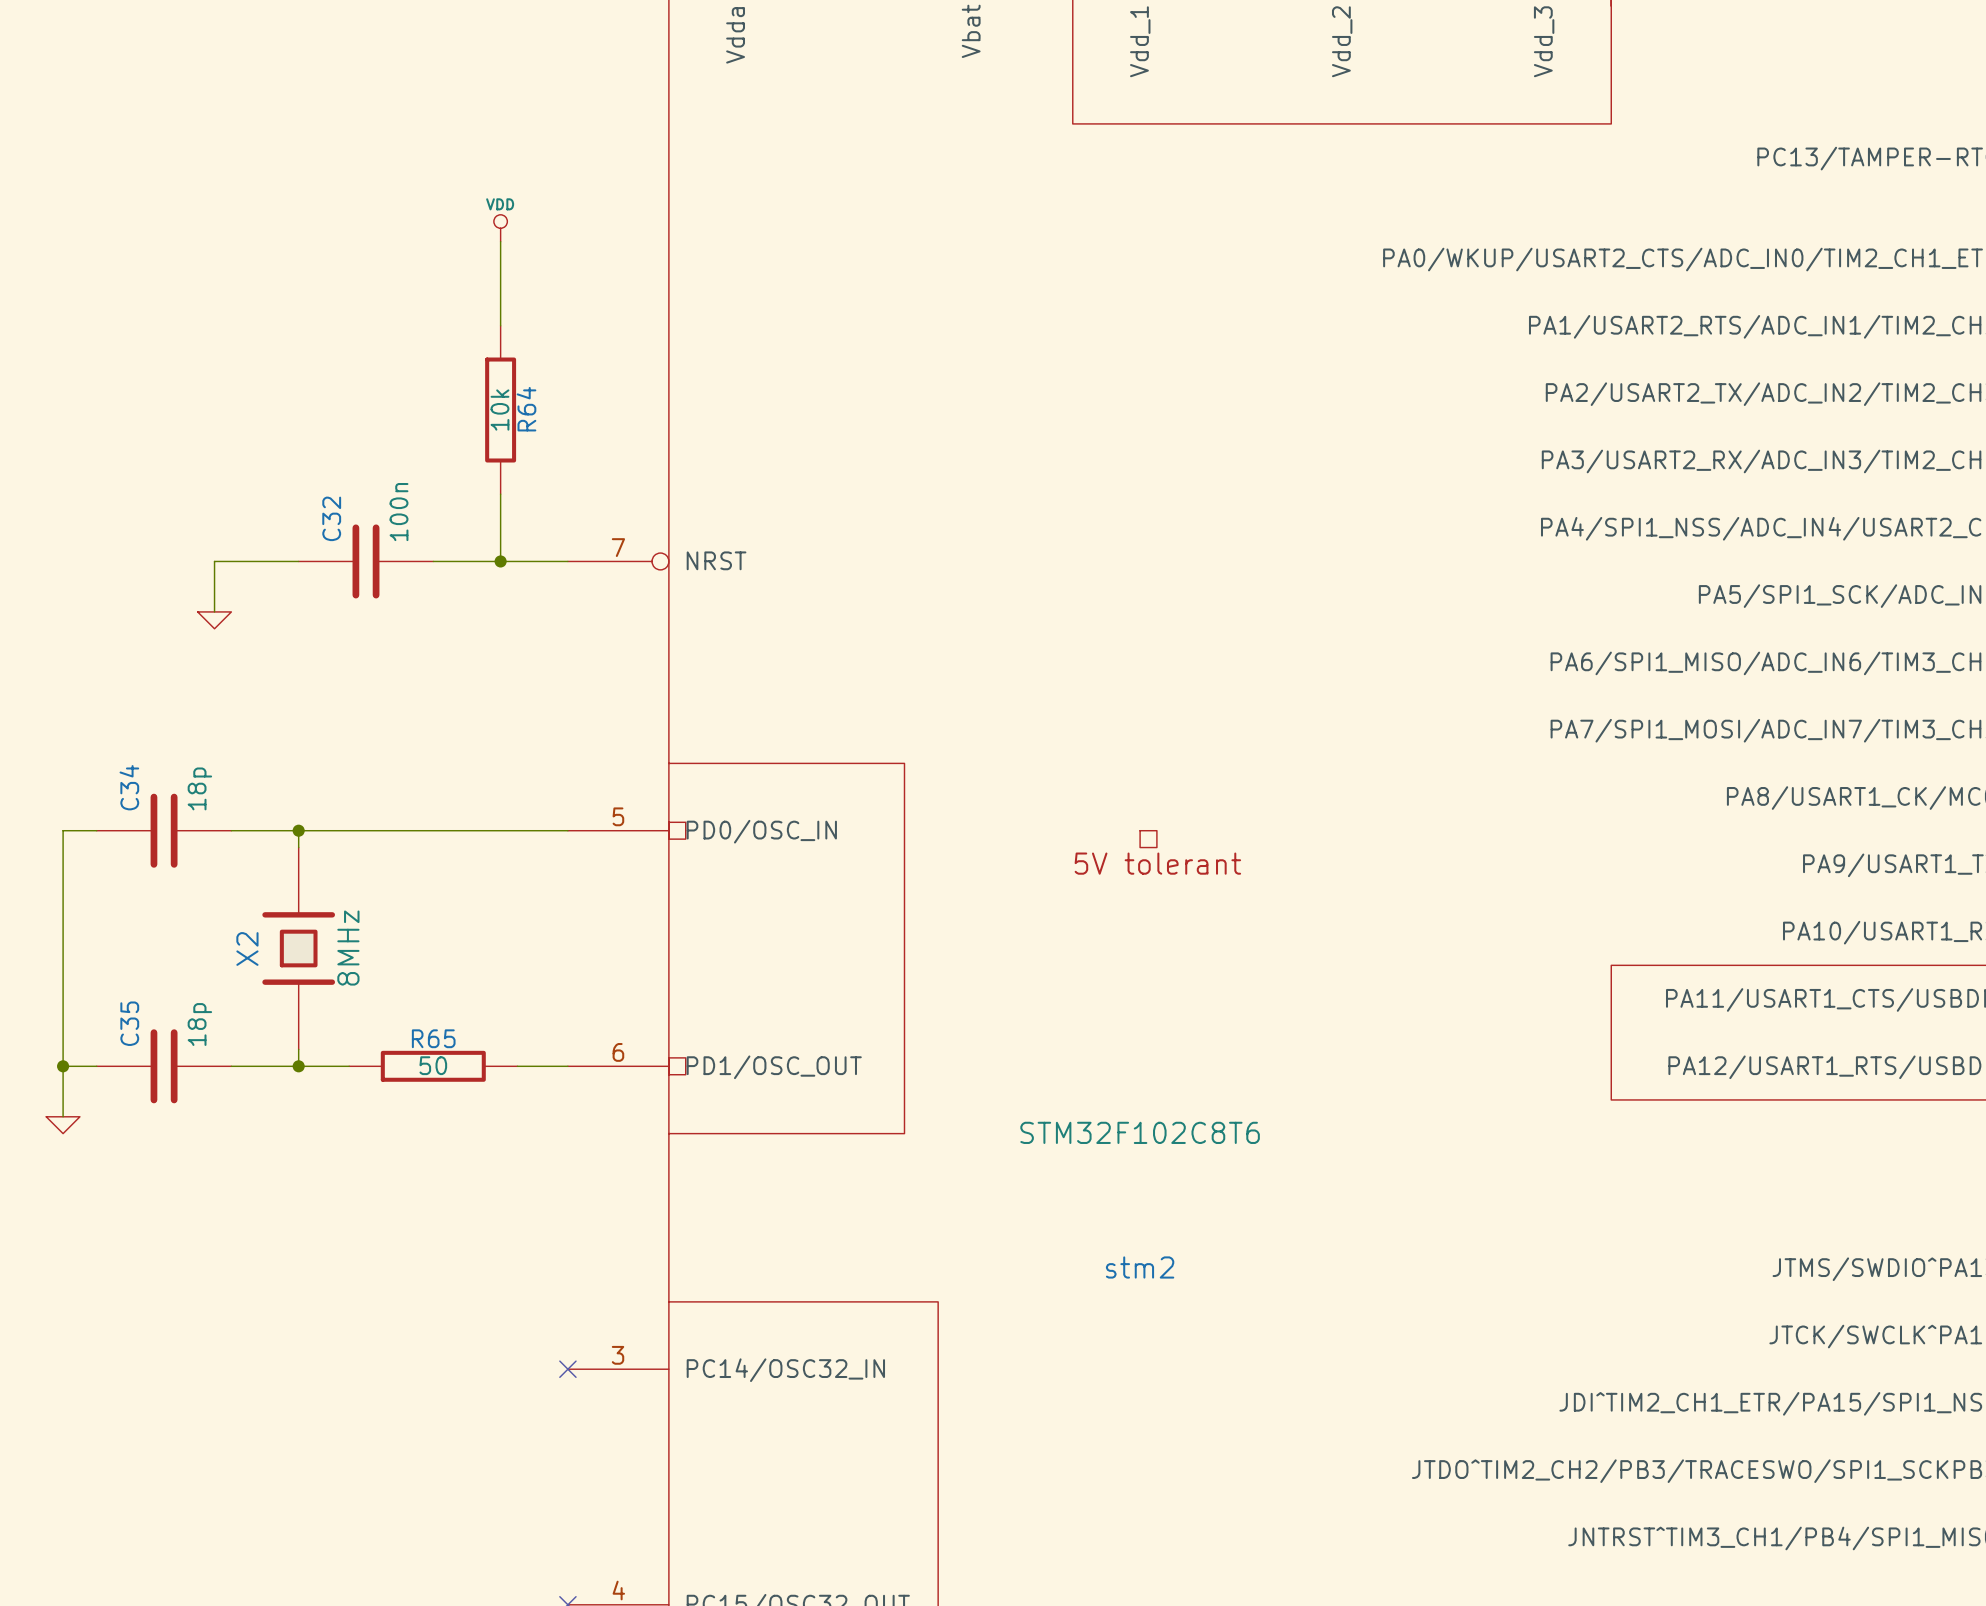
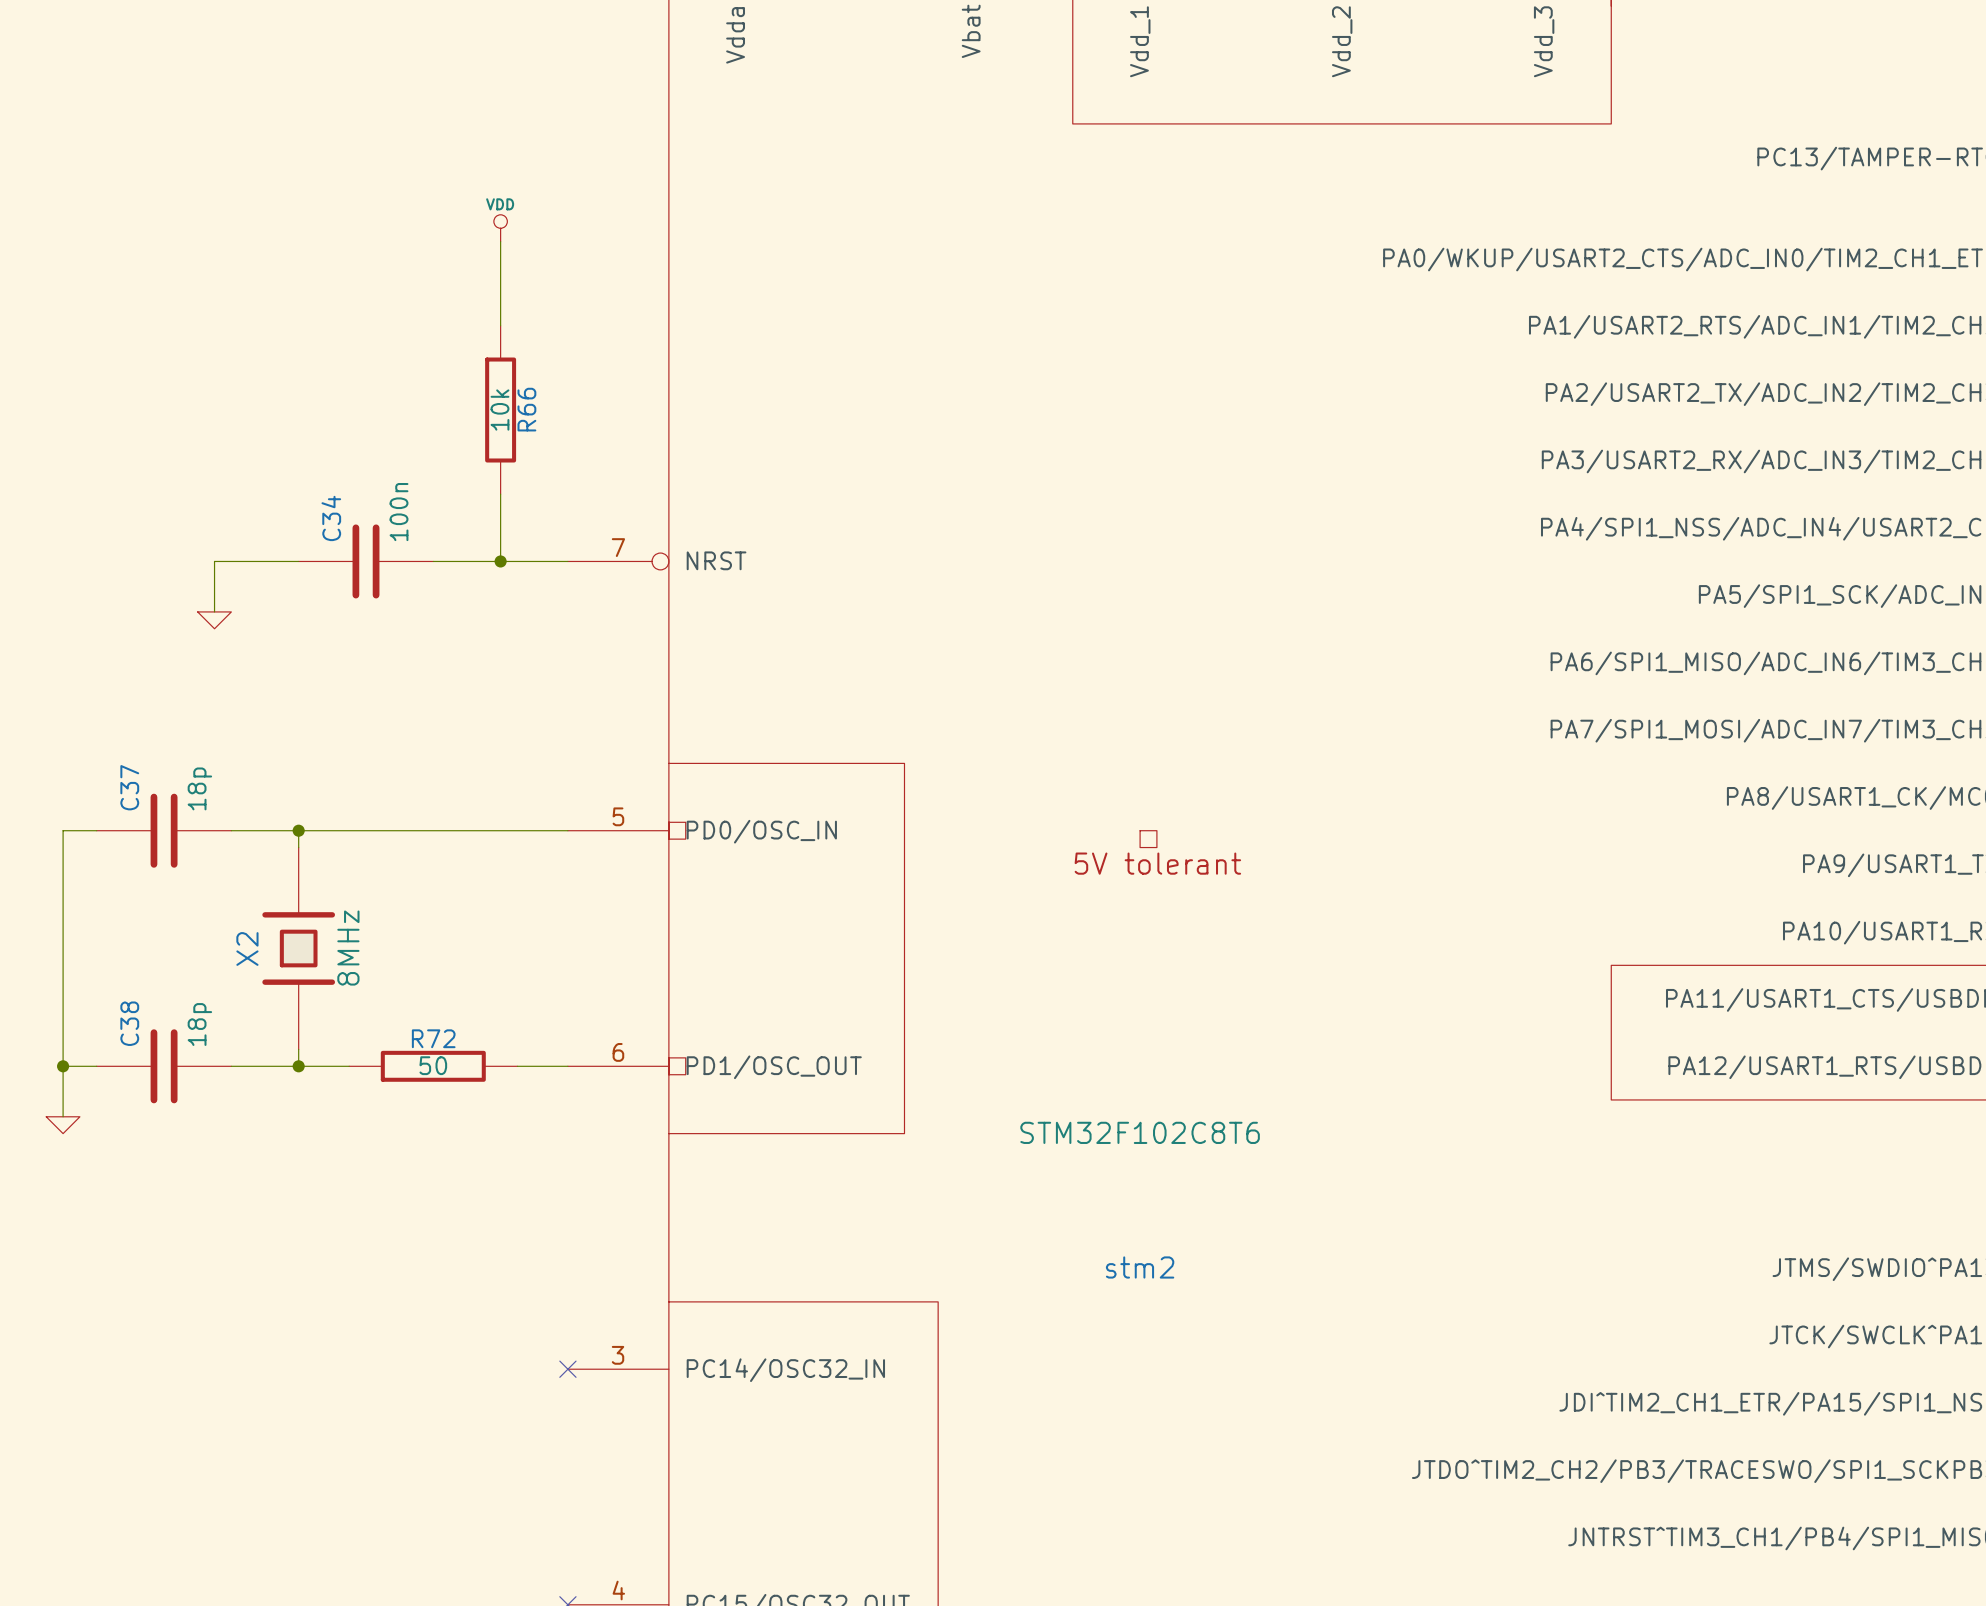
R64 name: R64 (526, 409) -> R66 (526, 409)
C32 name: C32 (331, 518) -> C34 (331, 518)
C34 name: C34 (129, 787) -> C37 (129, 787)
C35 name: C35 (129, 1023) -> C38 (129, 1023)
R65 name: R65 (433, 1038) -> R72 (433, 1038)

